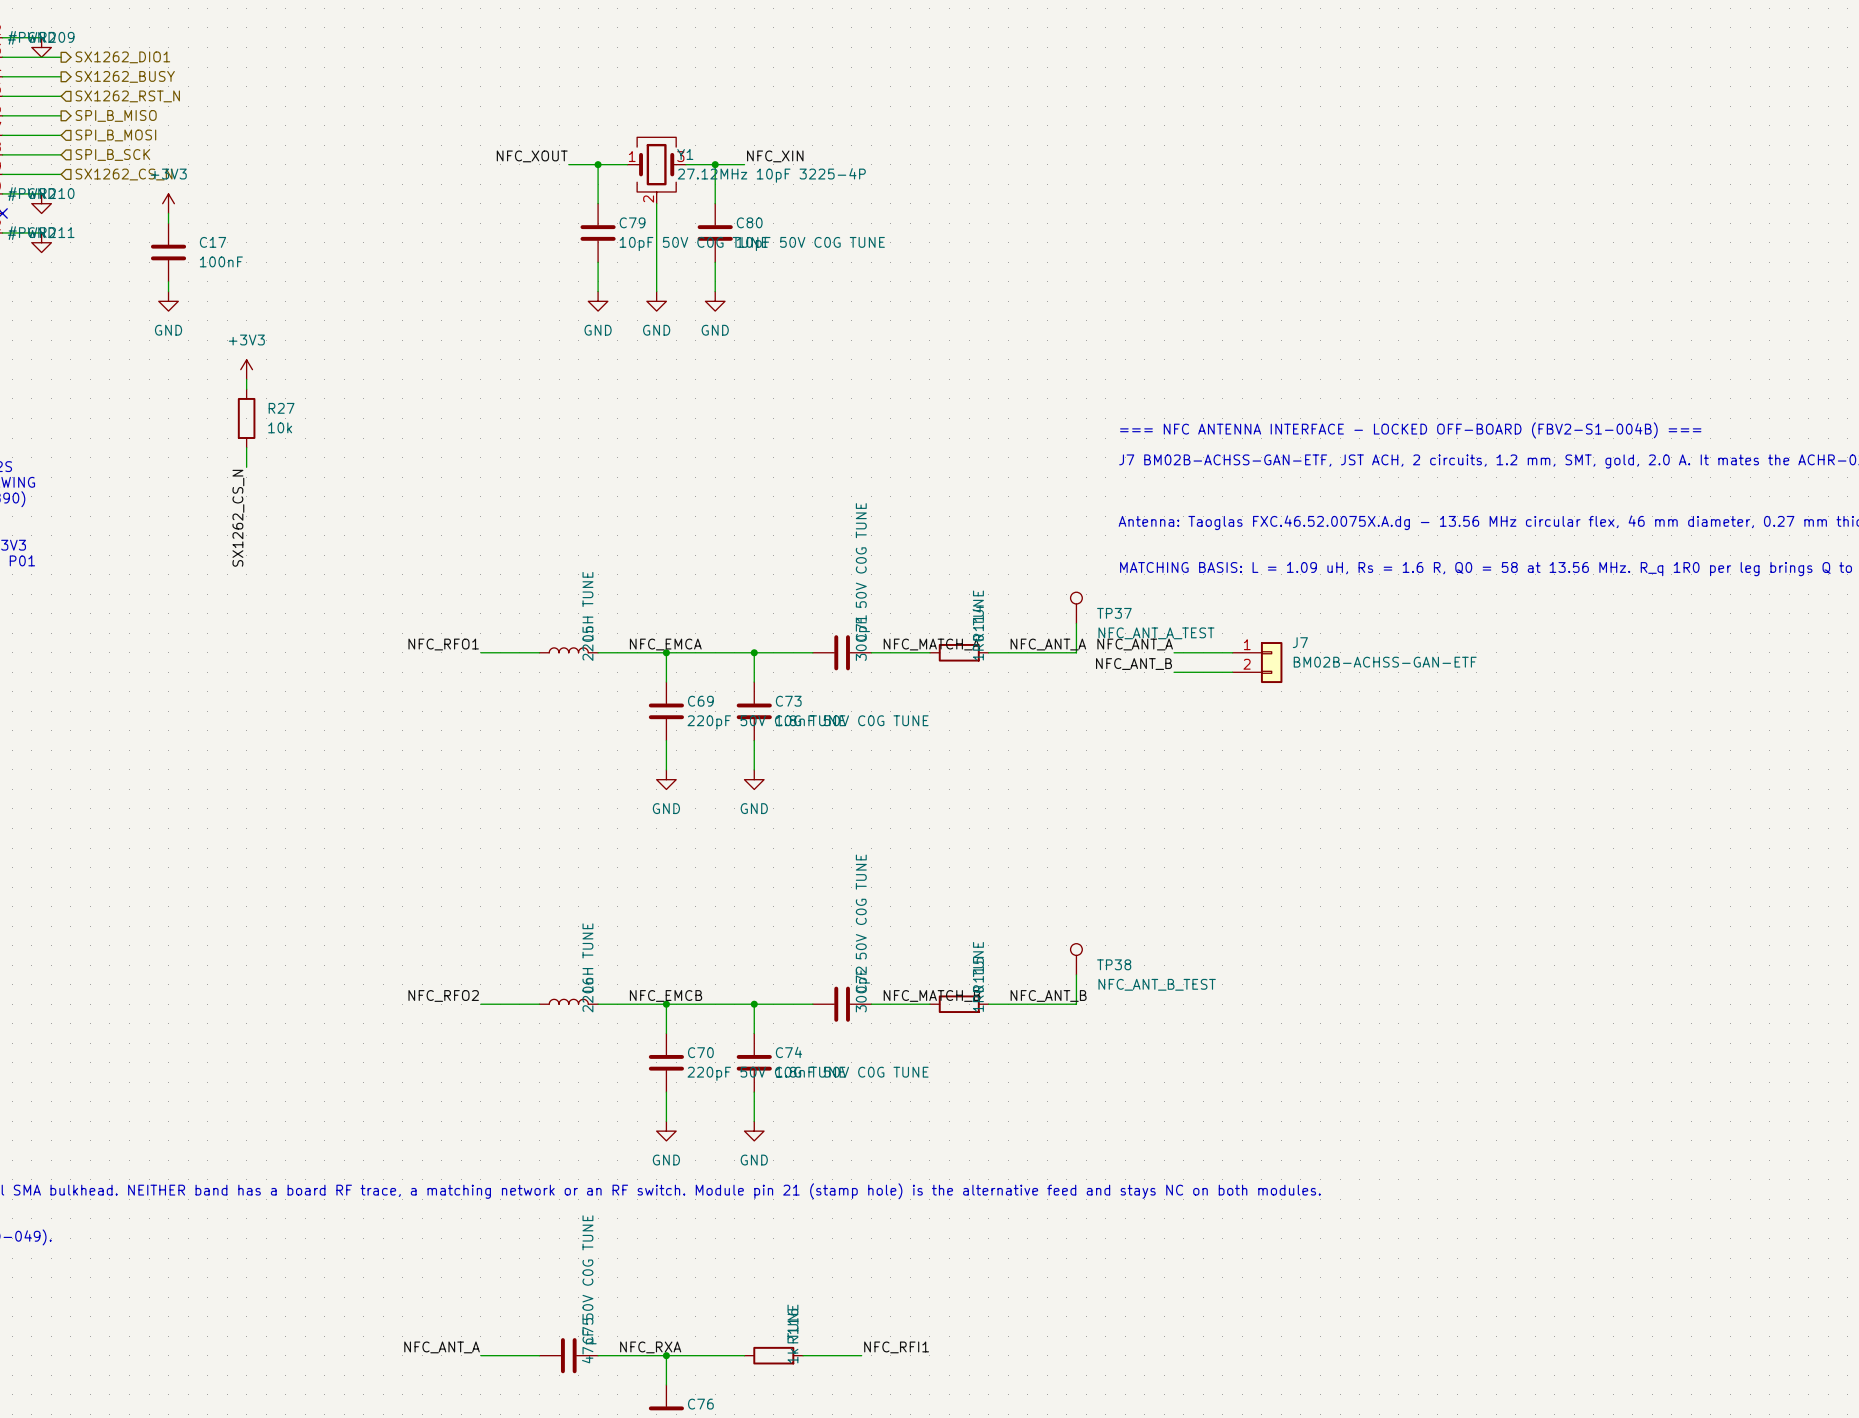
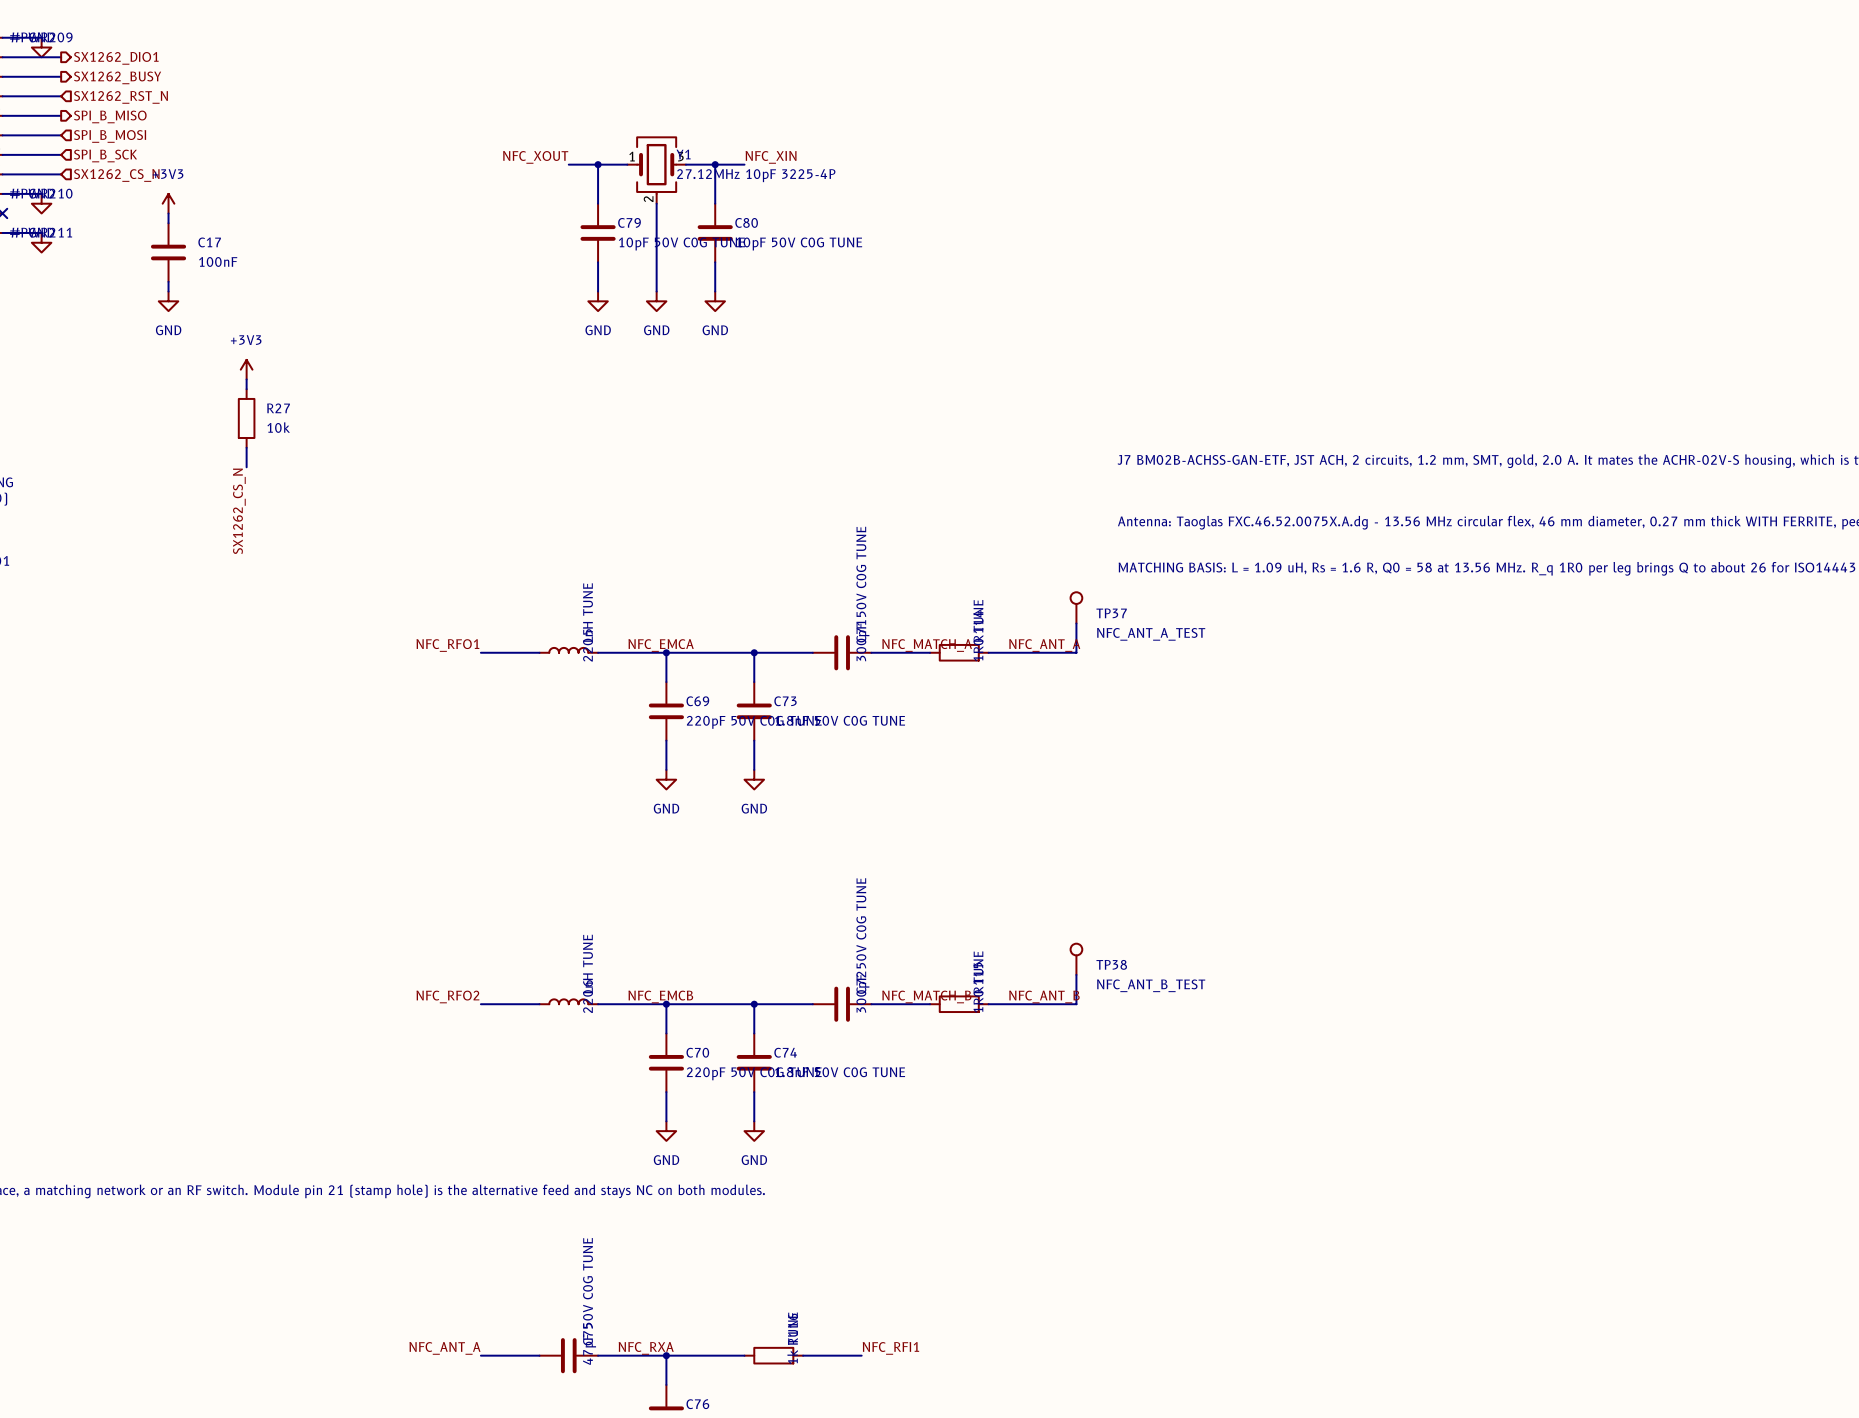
text: === NFC ANTENNA INTERFACE - LOCKED OFF-BOARD (FBV2-S1-004B) === (1410, 430) -> none
label: NFC_ANT_A (1135, 644) -> none
wire: (1174, 652) (1232, 652) -> none
J7: BM02B-ACHSS-GAN-ETF (1257, 662) -> none
label: NFC_ANT_B (1134, 664) -> none
wire: (1174, 672) (1232, 672) -> none

